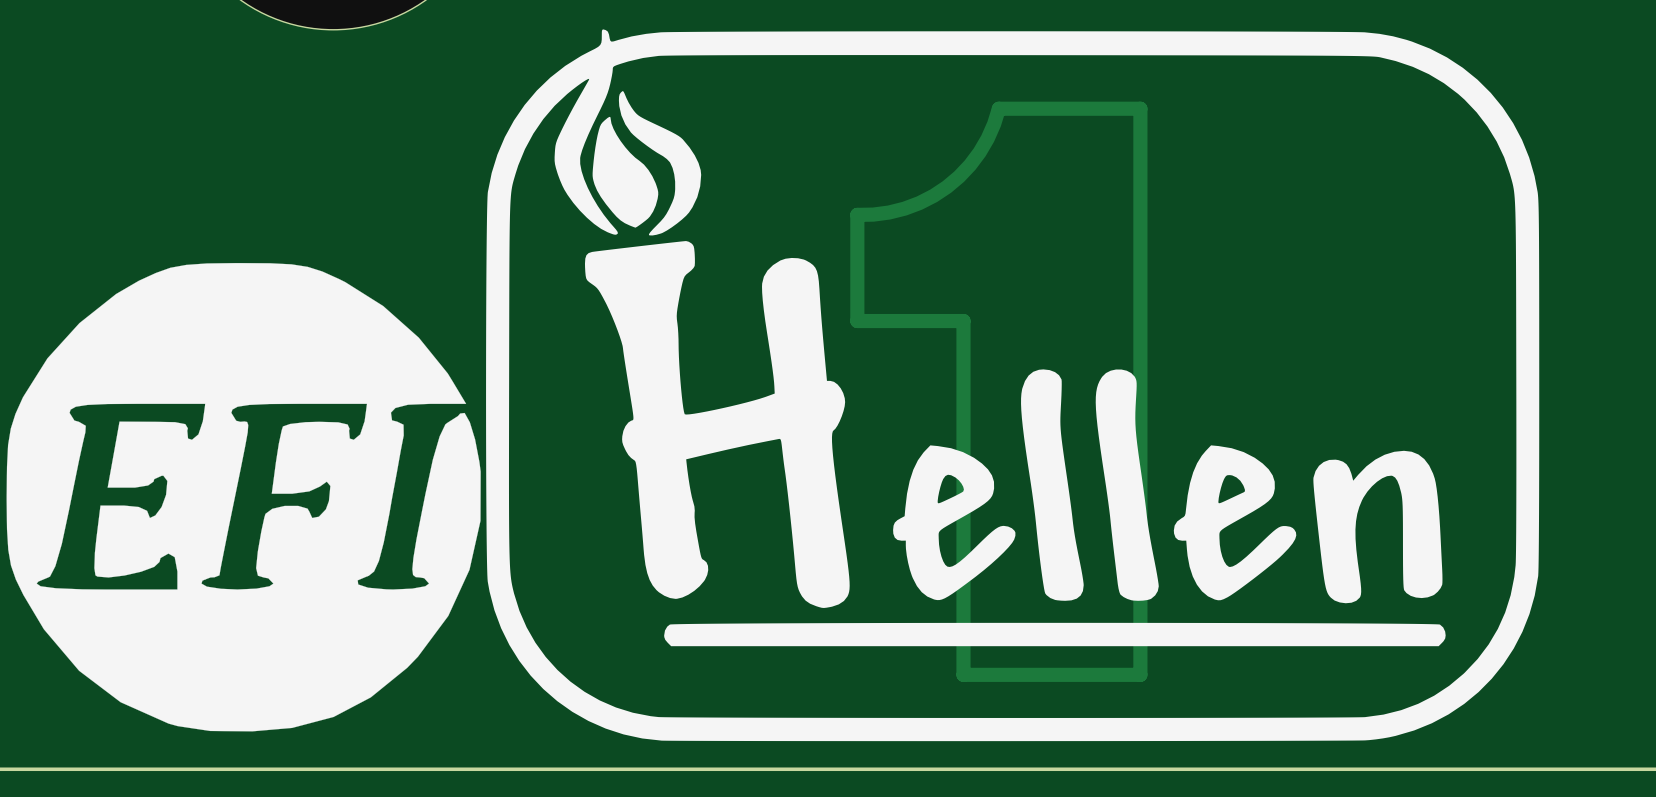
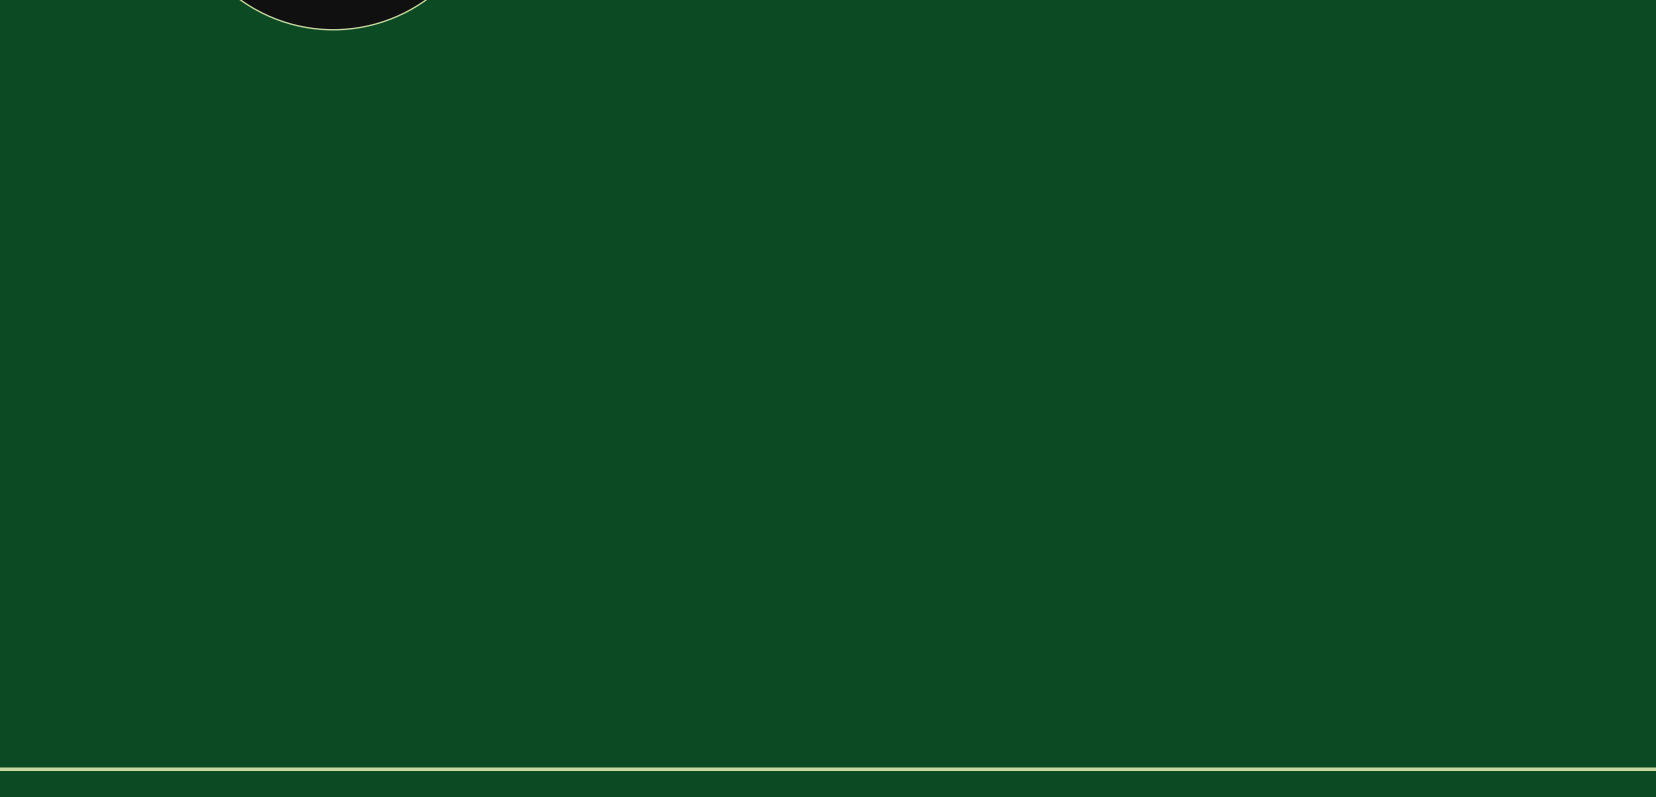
drawing: [6, 29, 1540, 742] -> none

